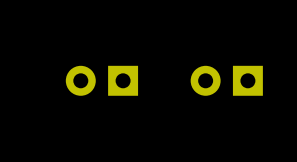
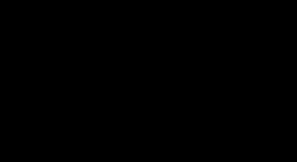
part: (101, 80) -> none
part: (226, 80) -> none

